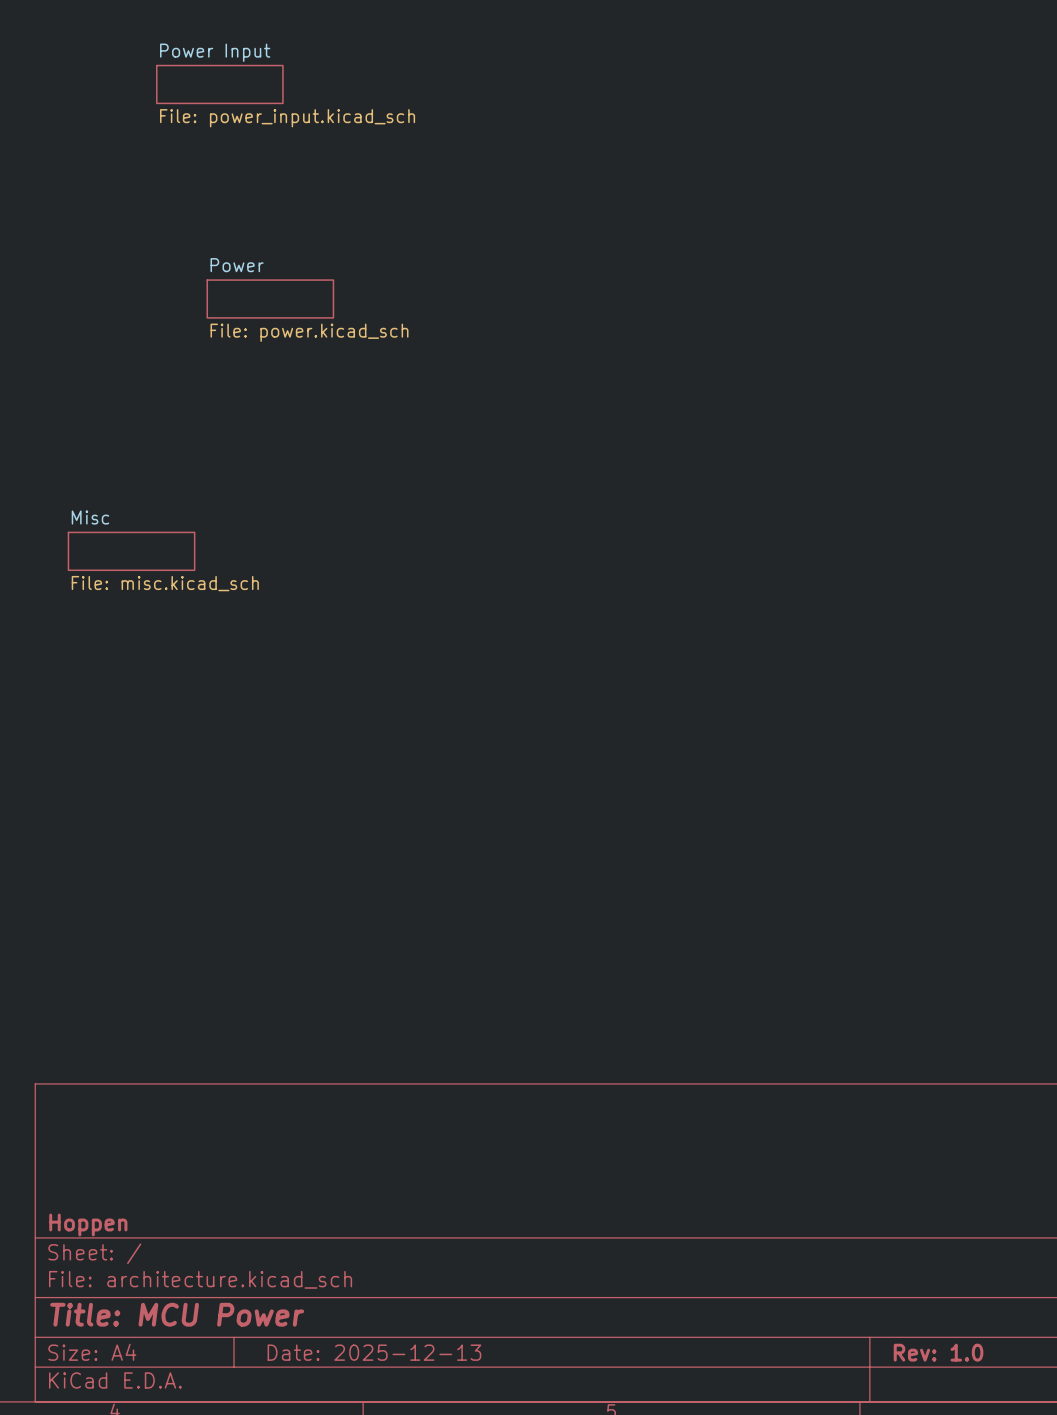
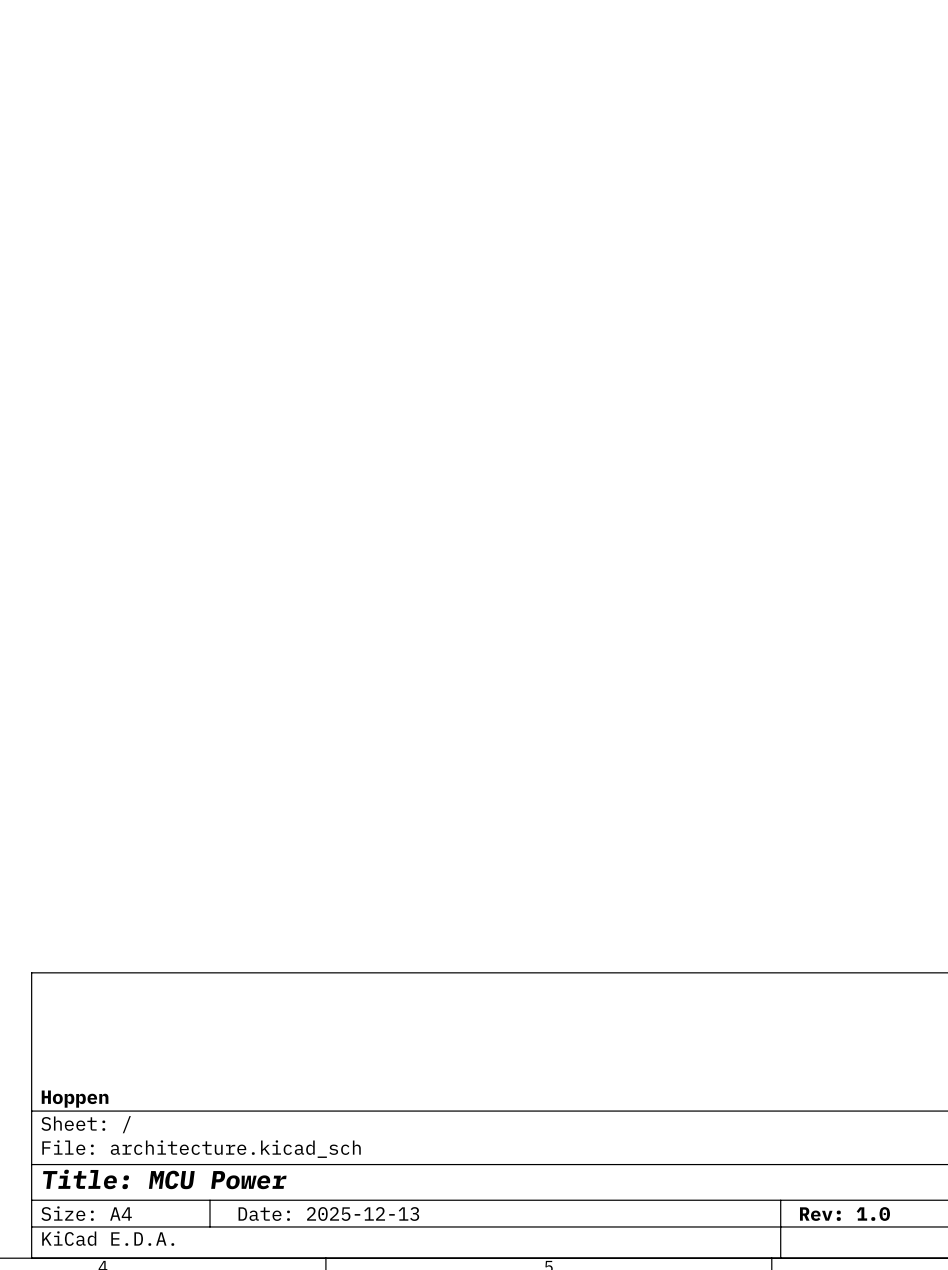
sheet Power Input: File: power_input.kicad_sch (219, 84) -> none
sheet Power: File: power.kicad_sch (270, 298) -> none
sheet Misc: File: misc.kicad_sch (131, 551) -> none

